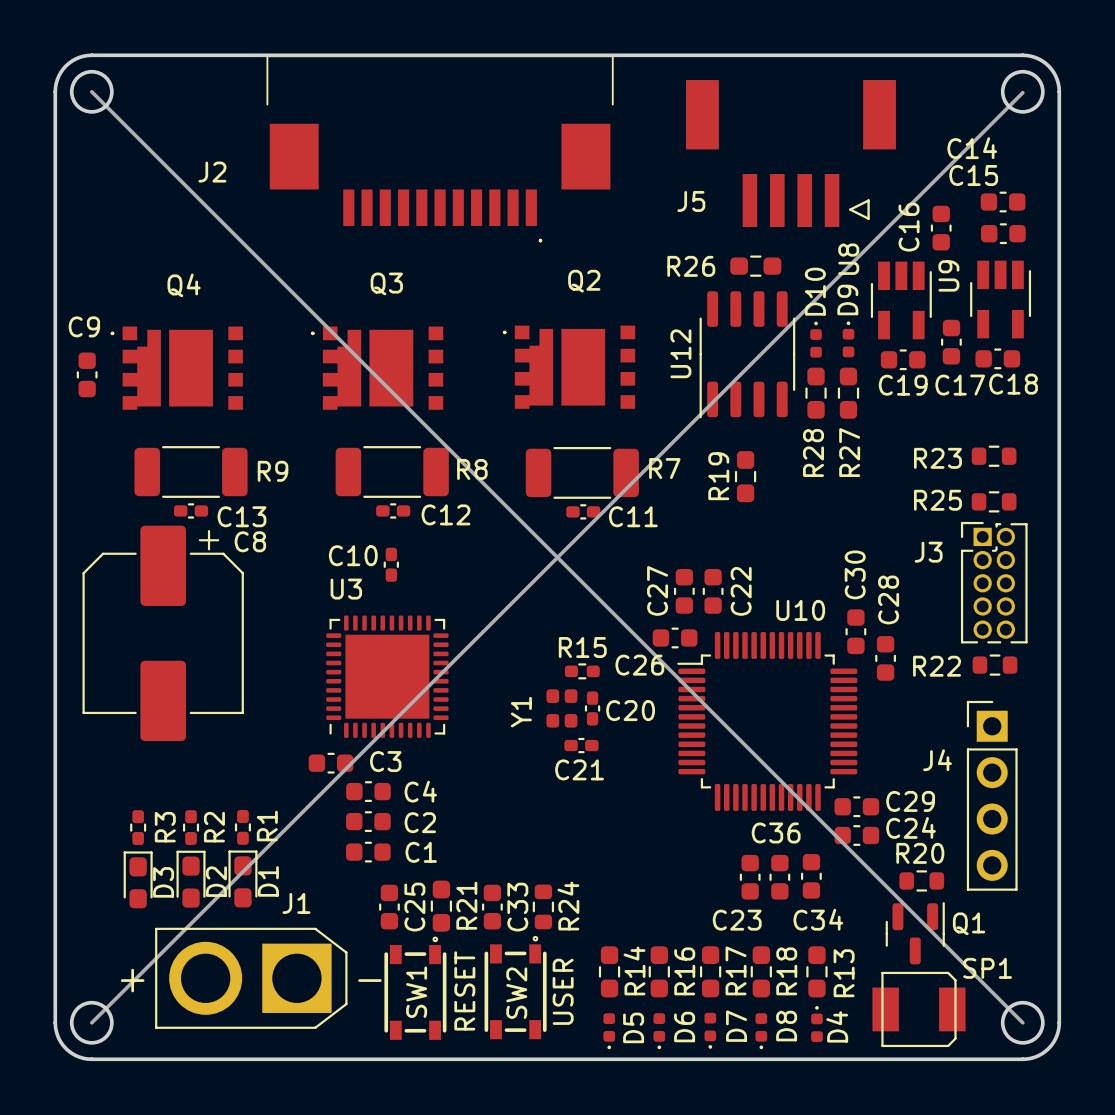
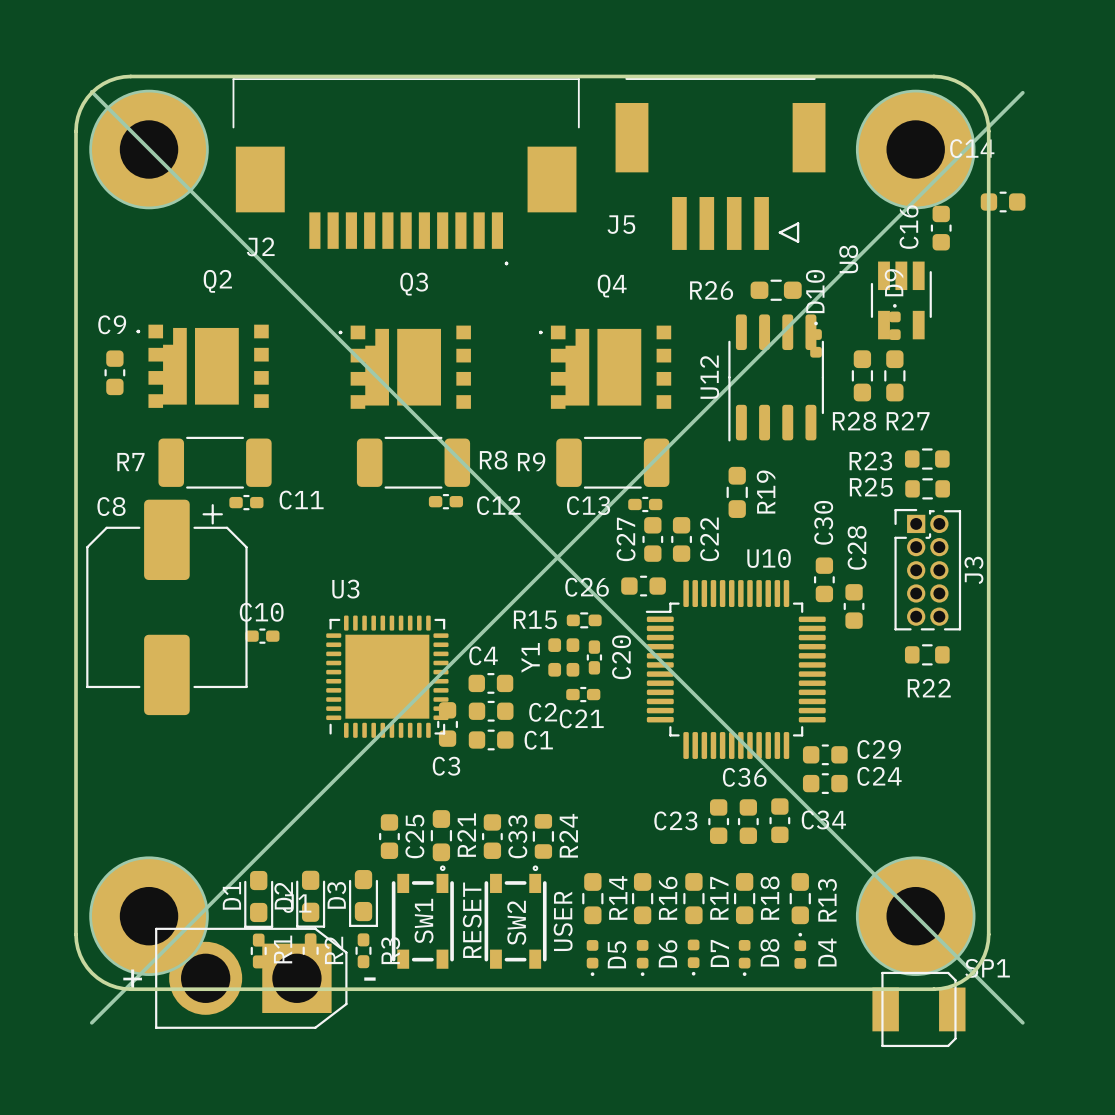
board edge: (91, 55) (1022, 55) (1034, 57) (1048, 65) (1057, 79) (1059, 91) (1059, 1022) (1057, 1034) (1048, 1048) (1038, 1055) (1022, 1059) (91, 1059) (75, 1055) (65, 1048) (57, 1034) (55, 1022) (55, 91) (57, 79) (65, 65) (79, 57) (91, 55) -> (130, 76) (109, 80) (92, 92) (80, 110) (76, 131) (76, 934) (80, 955) (92, 973) (109, 985) (130, 989) (933, 989) (954, 985) (972, 973) (984, 955) (988, 934) (988, 131) (984, 110) (972, 92) (954, 80) (933, 76) (130, 76)
round board edge: [69, 69, 114, 114] -> none
round board edge: [1000, 69, 1045, 114] -> none
J5 position: (791, 140) -> (720, 163)
J2 position: (440, 148) -> (406, 171)
part: none -> (149, 149)
part: none -> (915, 149)
J2 name position: J2 (212, 172) -> J2 (260, 246)
C15: (1003, 233) -> none
R26 position: (755, 266) -> (776, 290)
U9: (1000, 299) -> none
D9 position: (848, 339) -> (894, 322)
C17: (951, 342) -> none
U12 position: (747, 354) -> (776, 377)
C18: (997, 358) -> none
C19: (903, 359) -> none
Q2 position: (568, 367) -> (202, 366)
Q4 position: (176, 368) -> (605, 367)
Q3 position: (377, 368) -> (404, 367)
C9 position: (87, 374) -> (114, 372)
R28 position: (816, 393) -> (862, 375)
R27 position: (848, 393) -> (894, 375)
R27 name rotation: 0° (849, 452) -> 90° clockwise (908, 421)
R28 name rotation: 0° (813, 453) -> 90° clockwise (854, 421)
R23 position: (994, 456) -> (927, 459)
R7 name position: R7 (664, 468) -> R7 (130, 462)
R9 name position: R9 (273, 471) -> R9 (531, 461)
R9 position: (191, 472) -> (612, 462)
R8 position: (392, 472) -> (413, 462)
R7 position: (582, 472) -> (215, 462)
R19 name position: R19 (718, 476) -> R19 (766, 492)
R19 position: (745, 476) -> (737, 492)
R25 position: (994, 501) -> (927, 488)
C13 position: (191, 510) -> (645, 504)
C12 position: (393, 510) -> (445, 501)
C11 position: (583, 511) -> (246, 502)
C13 name position: C13 (241, 516) -> C13 (588, 505)
C11 name position: C11 (633, 516) -> C11 (301, 500)
C8 name position: C8 (250, 541) -> C8 (111, 506)
J3 name rotation: 0° (928, 552) -> 90° counterclockwise (973, 570)
J3 name position: J3 (928, 552) -> J3 (973, 570)
C10 rotation: 0° (391, 564) -> 90° clockwise (262, 636)
C10 position: (391, 564) -> (262, 636)
J3 position: (994, 582) -> (927, 569)
C27 position: (684, 591) -> (652, 539)
C22 position: (713, 591) -> (681, 539)
C30 position: (855, 631) -> (824, 579)
C8 position: (163, 633) -> (166, 607)
C26 position: (675, 637) -> (643, 586)
R15 name position: R15 (582, 647) -> R15 (535, 619)
C28 position: (885, 658) -> (854, 606)
C26 name position: C26 (639, 665) -> C26 (587, 587)
R22 position: (995, 665) -> (927, 654)
R22 name position: R22 (937, 666) -> R22 (929, 688)
R15 position: (582, 671) -> (584, 620)
Y1 position: (561, 708) -> (563, 657)
C20 position: (592, 708) -> (594, 657)
C20 name rotation: 0° (630, 710) -> 90° counterclockwise (621, 657)
Y1 name position: Y1 (521, 712) -> Y1 (530, 657)
U10 position: (767, 721) -> (735, 669)
C21 position: (581, 745) -> (583, 694)
C3 rotation: 0° (331, 763) -> 90° clockwise (447, 724)
C3 position: (331, 763) -> (447, 724)
C4 position: (368, 791) -> (490, 683)
C4 name position: C4 (420, 791) -> C4 (483, 655)
J4: (992, 795) -> none
C29 position: (856, 806) -> (825, 754)
C2 position: (368, 821) -> (491, 711)
R3 position: (138, 827) -> (363, 950)
R2 position: (191, 827) -> (310, 950)
R1 position: (242, 827) -> (258, 950)
C24 position: (856, 835) -> (825, 783)
C1 position: (368, 852) -> (491, 739)
C1 name position: C1 (421, 852) -> C1 (538, 740)
C34 position: (811, 876) -> (779, 820)
C23 position: (750, 877) -> (718, 821)
C36 position: (779, 877) -> (748, 821)
D1 rotation: 0° (242, 878) -> 180° (258, 899)
D3 rotation: 0° (138, 879) -> 180° (363, 898)
D3 position: (138, 879) -> (363, 898)
D2 rotation: 0° (191, 879) -> 180° (310, 899)
D2 position: (191, 879) -> (310, 899)
R20: (921, 880) -> none
R21 position: (441, 906) -> (441, 835)
R24 position: (543, 906) -> (543, 836)
C25 position: (389, 907) -> (389, 836)
C33 position: (492, 907) -> (492, 836)
part: none -> (149, 916)
part: none -> (915, 916)
C34 name position: C34 (818, 919) -> C34 (823, 819)
C23 name position: C23 (737, 920) -> C23 (675, 820)
Q1: (915, 933) -> none
R14 position: (609, 971) -> (592, 898)
R16 position: (659, 971) -> (642, 898)
R17 position: (710, 971) -> (693, 898)
R18 position: (761, 971) -> (744, 898)
R13 position: (816, 971) -> (800, 898)
SW2 position: (515, 987) -> (515, 917)
SW1 position: (415, 988) -> (422, 917)
round board edge: [69, 1000, 114, 1045] -> none
round board edge: [1000, 1000, 1045, 1045] -> none
D4 position: (816, 1024) -> (800, 950)
D4 name position: D4 (837, 1026) -> D4 (827, 952)
D7 position: (710, 1030) -> (693, 957)
D5 position: (609, 1031) -> (592, 958)
D6 position: (659, 1031) -> (642, 958)
D8 position: (761, 1031) -> (744, 957)

